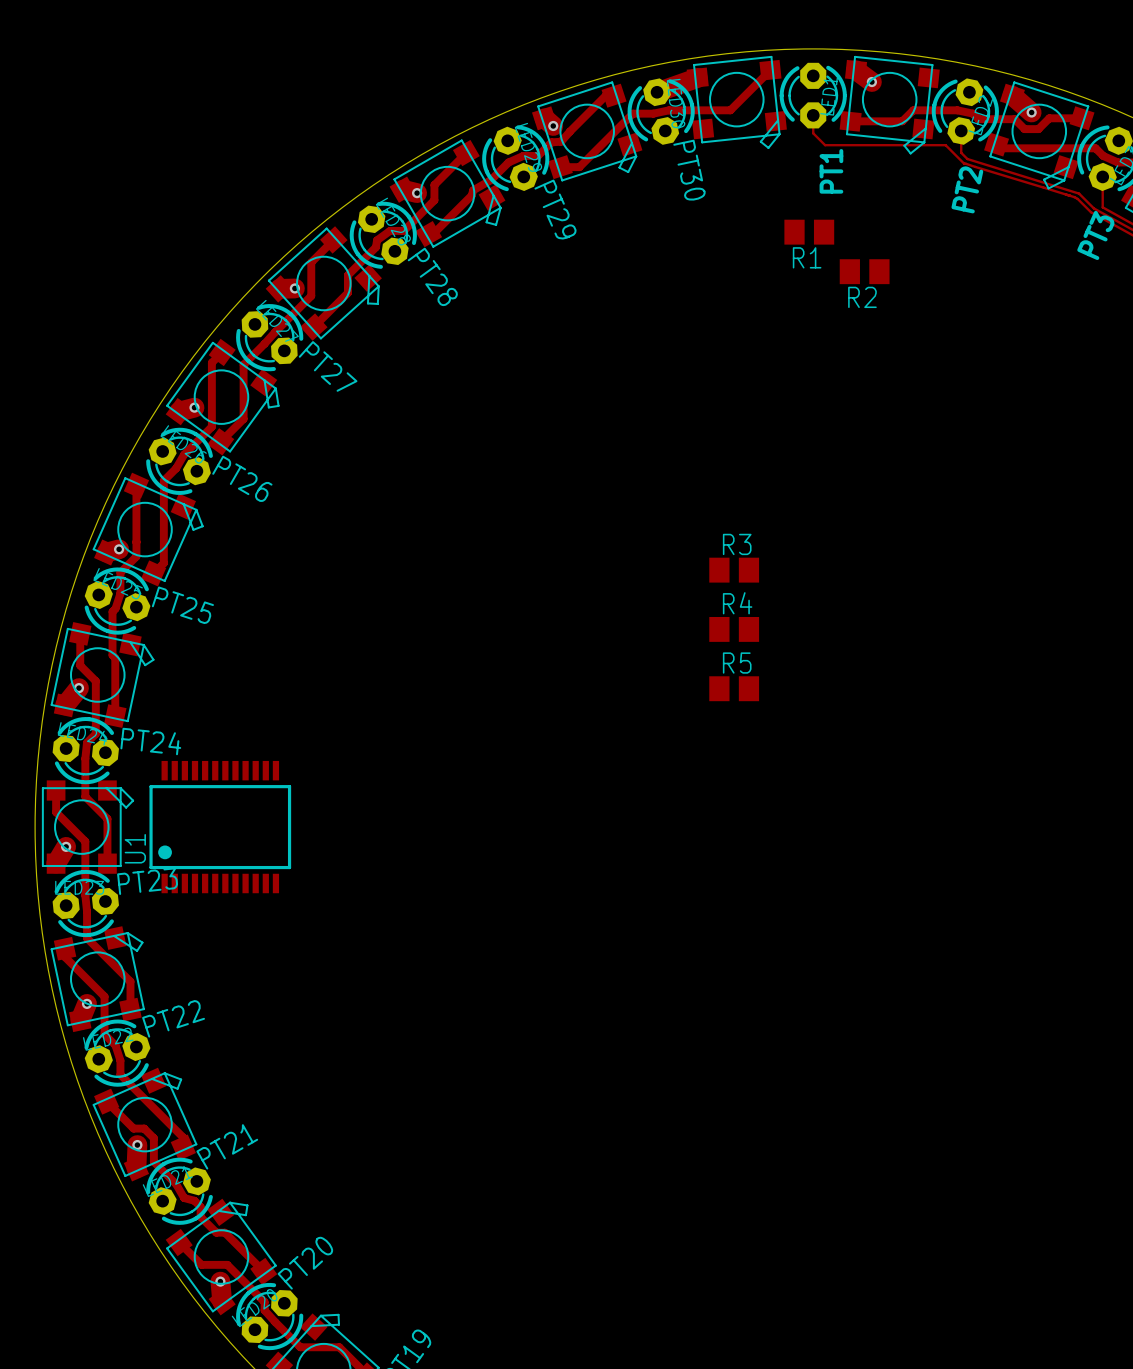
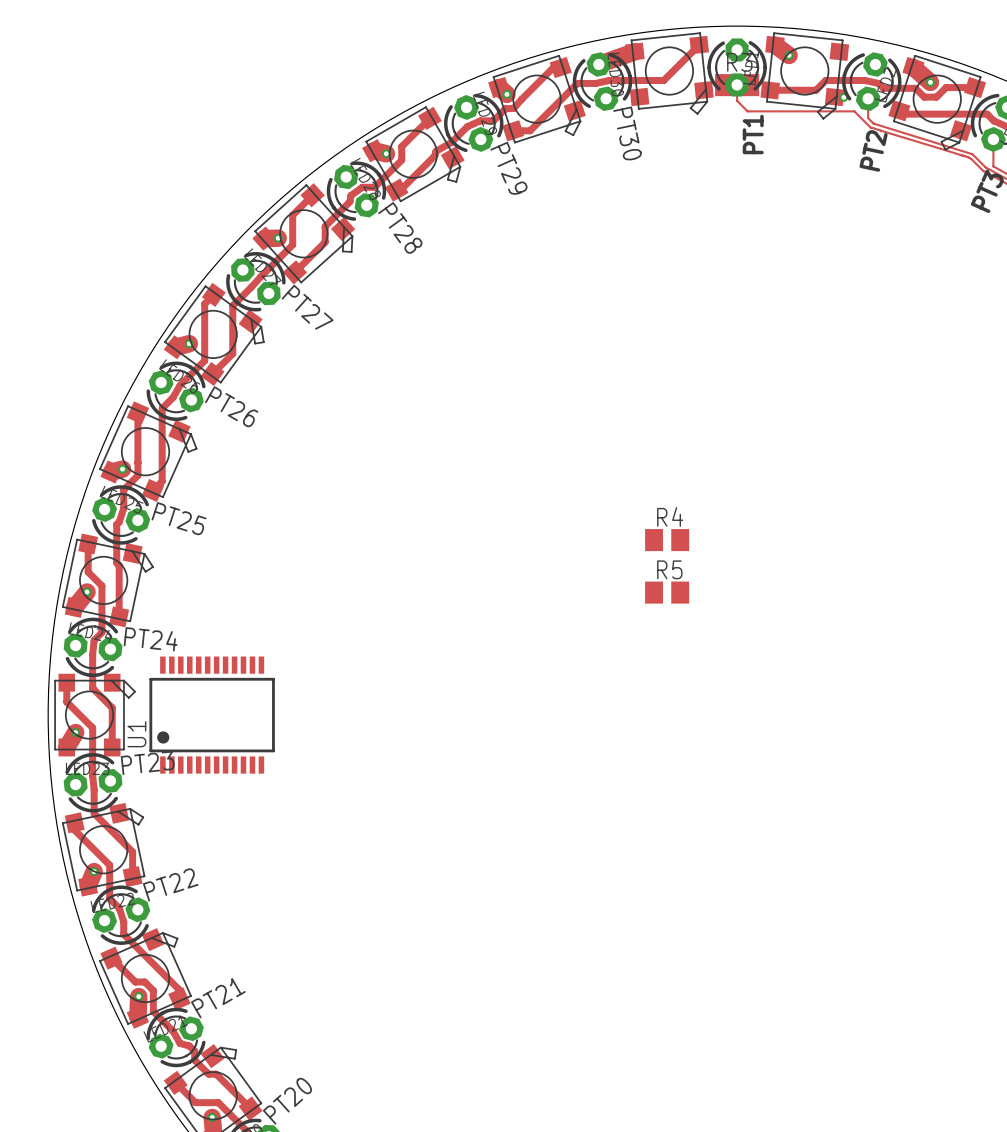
via: none -> (843, 97)
R1: (809, 232) -> none
R2: (864, 271) -> none
R3 position: (734, 570) -> (737, 85)

